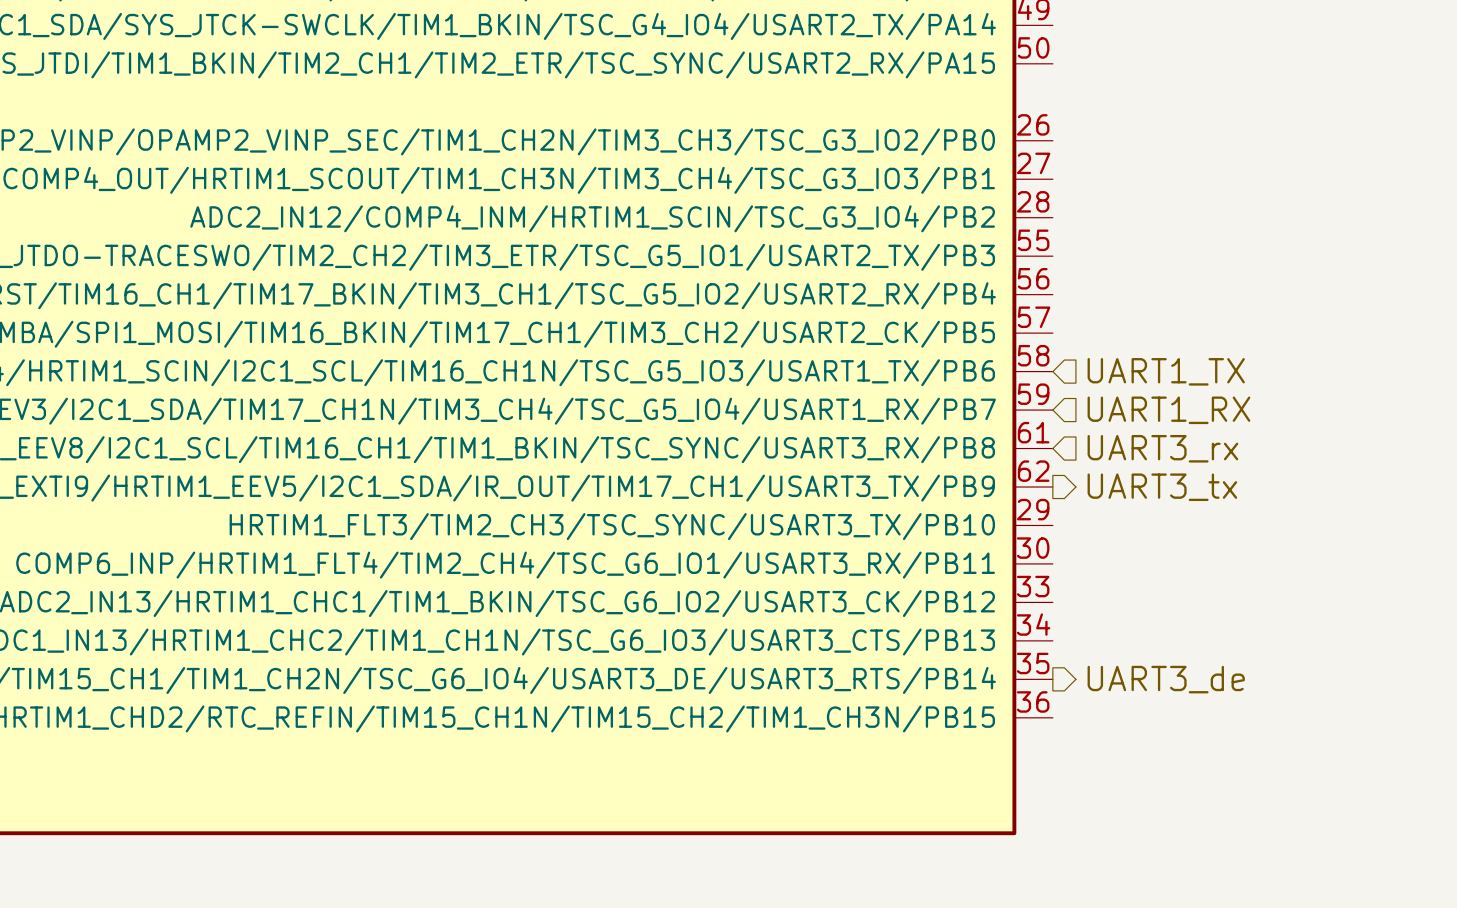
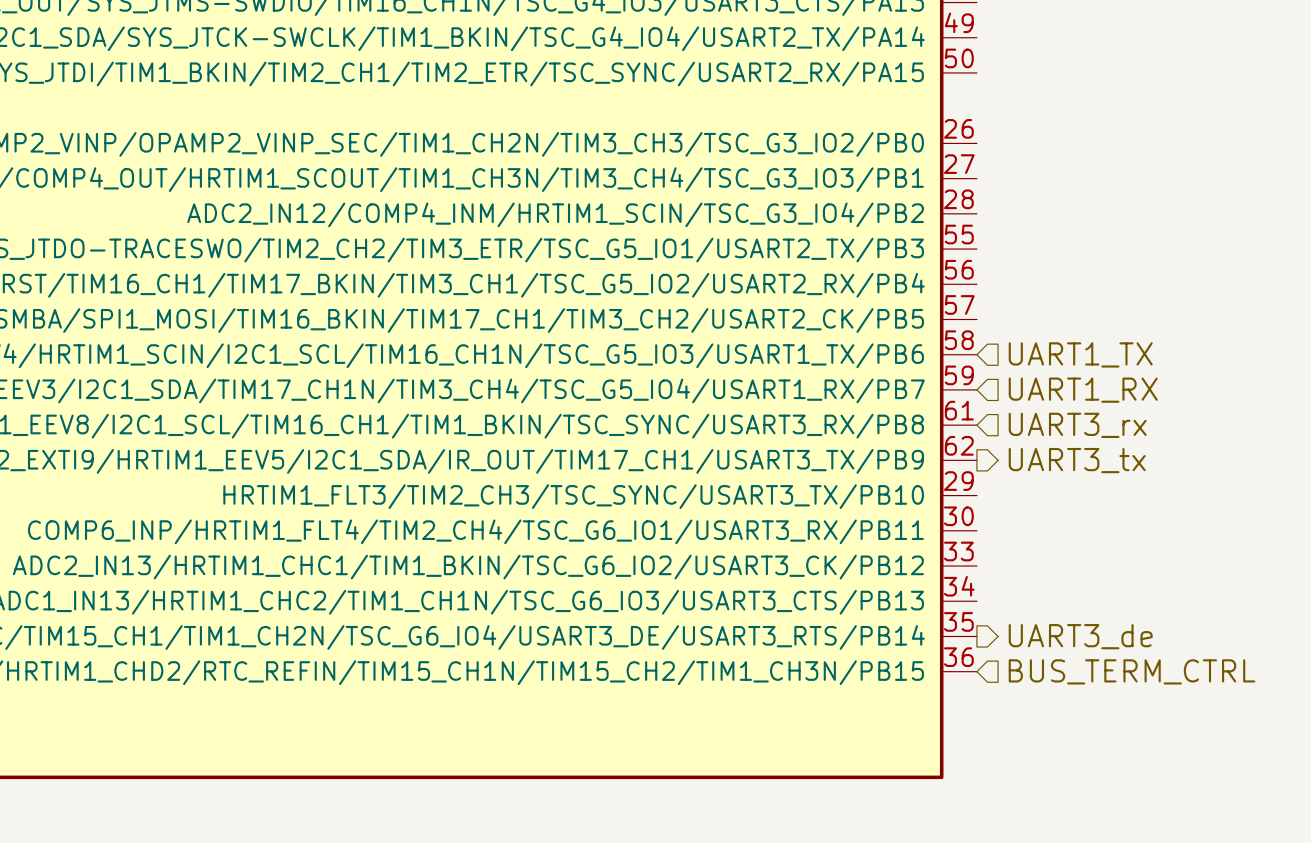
hierarchical label: none -> BUS_TERM_CTRL (1132, 671)

